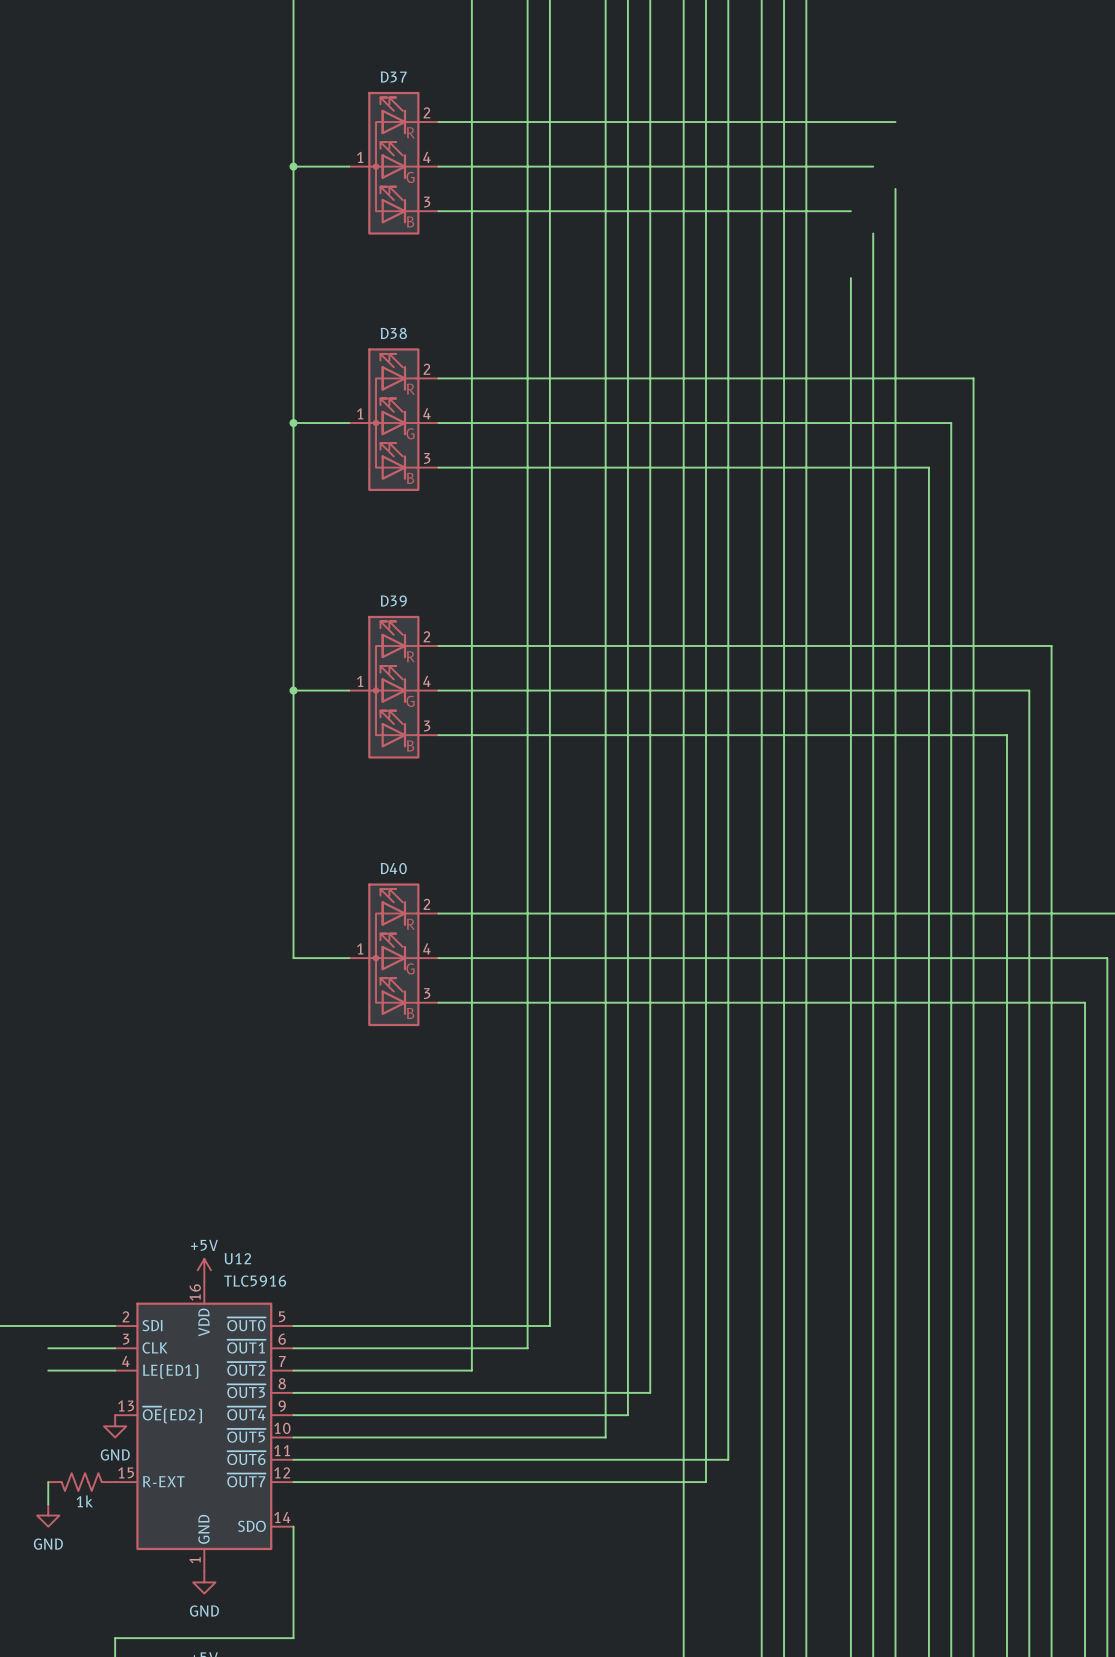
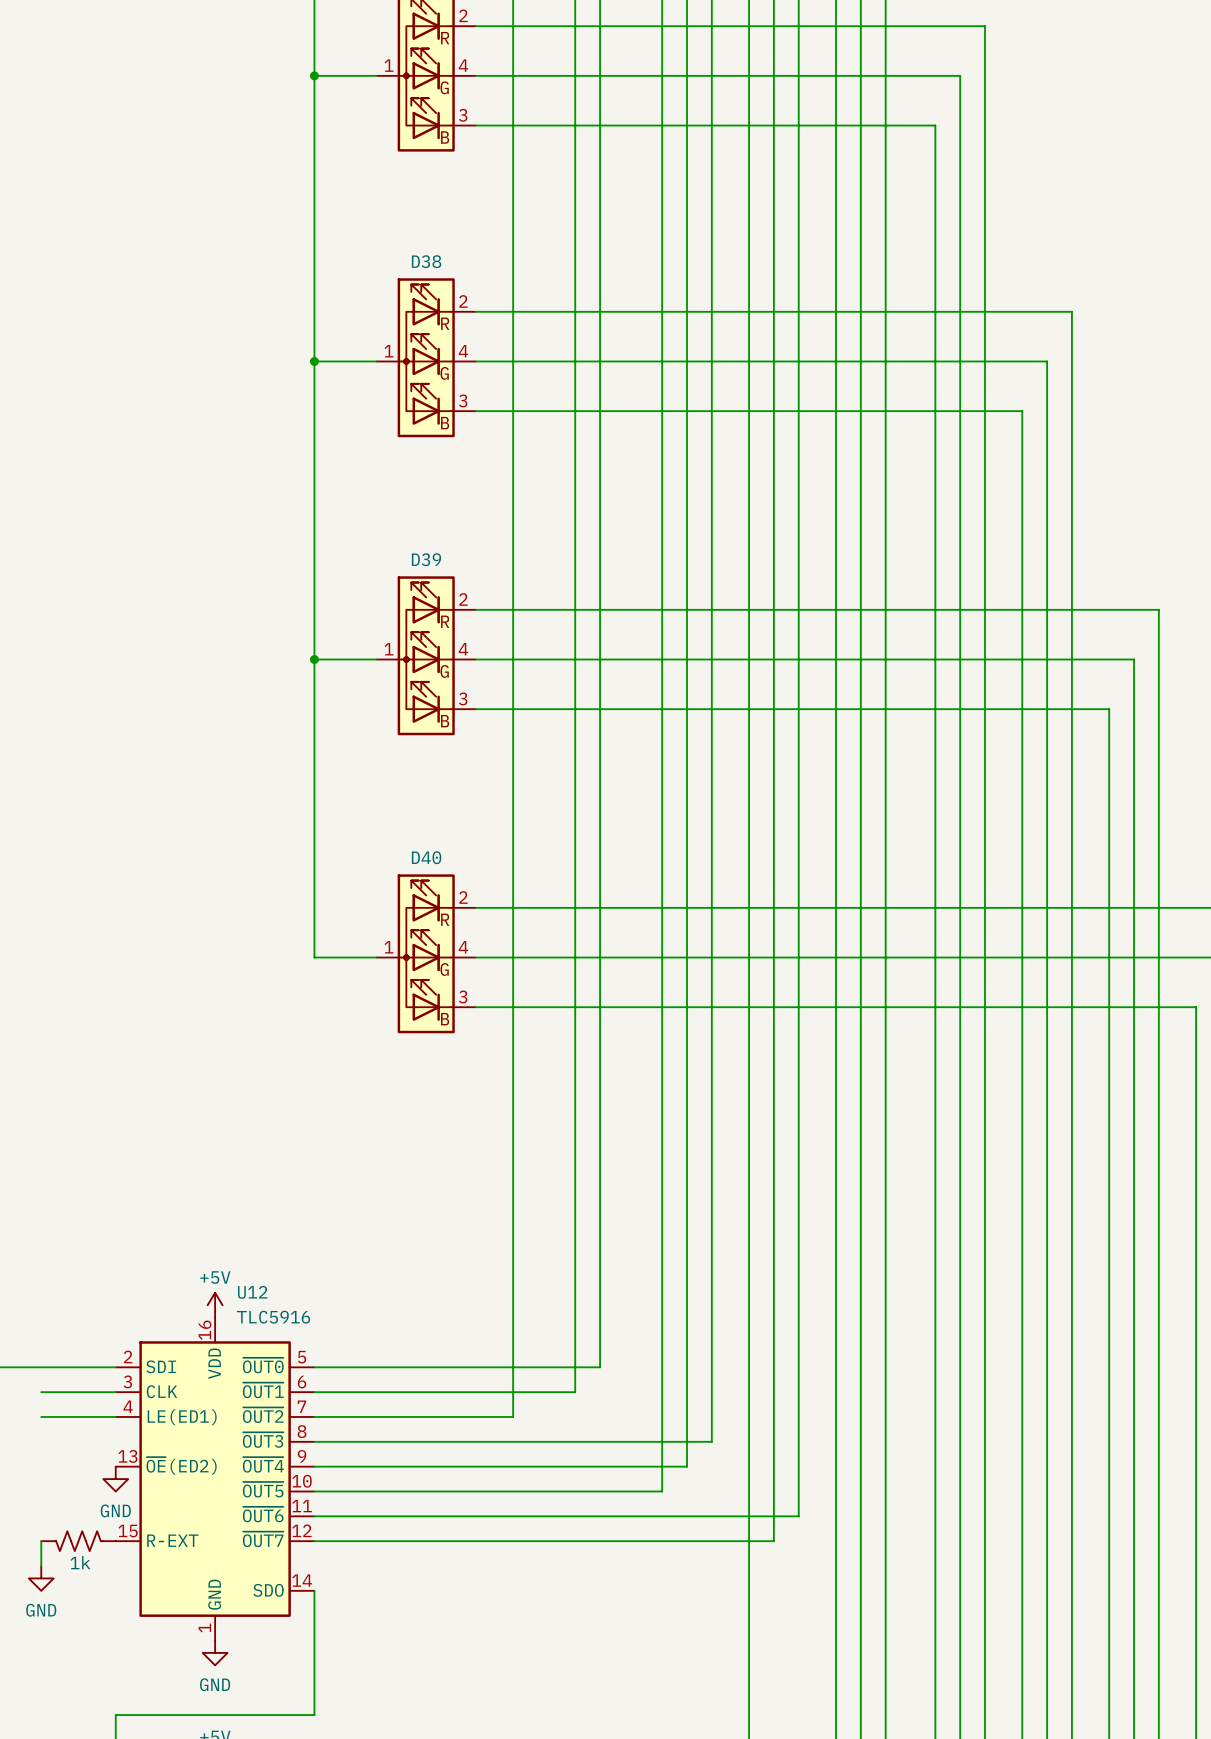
wire: none -> (985, 26) (985, 100)
wire: none -> (960, 75) (960, 150)
wire: none -> (935, 125) (935, 200)

